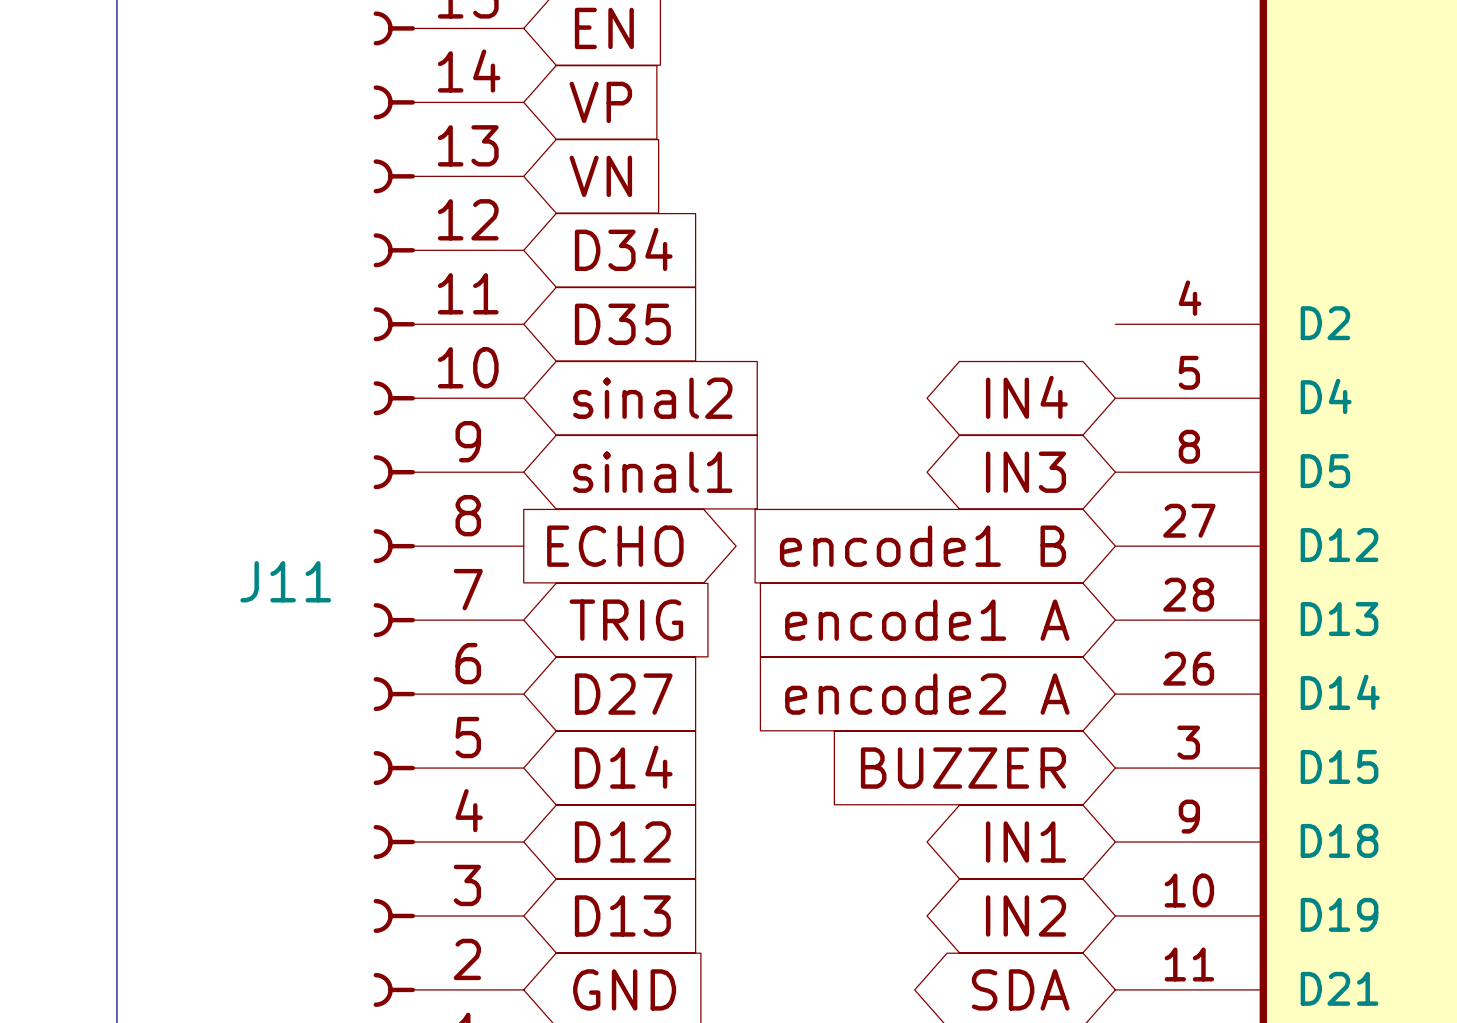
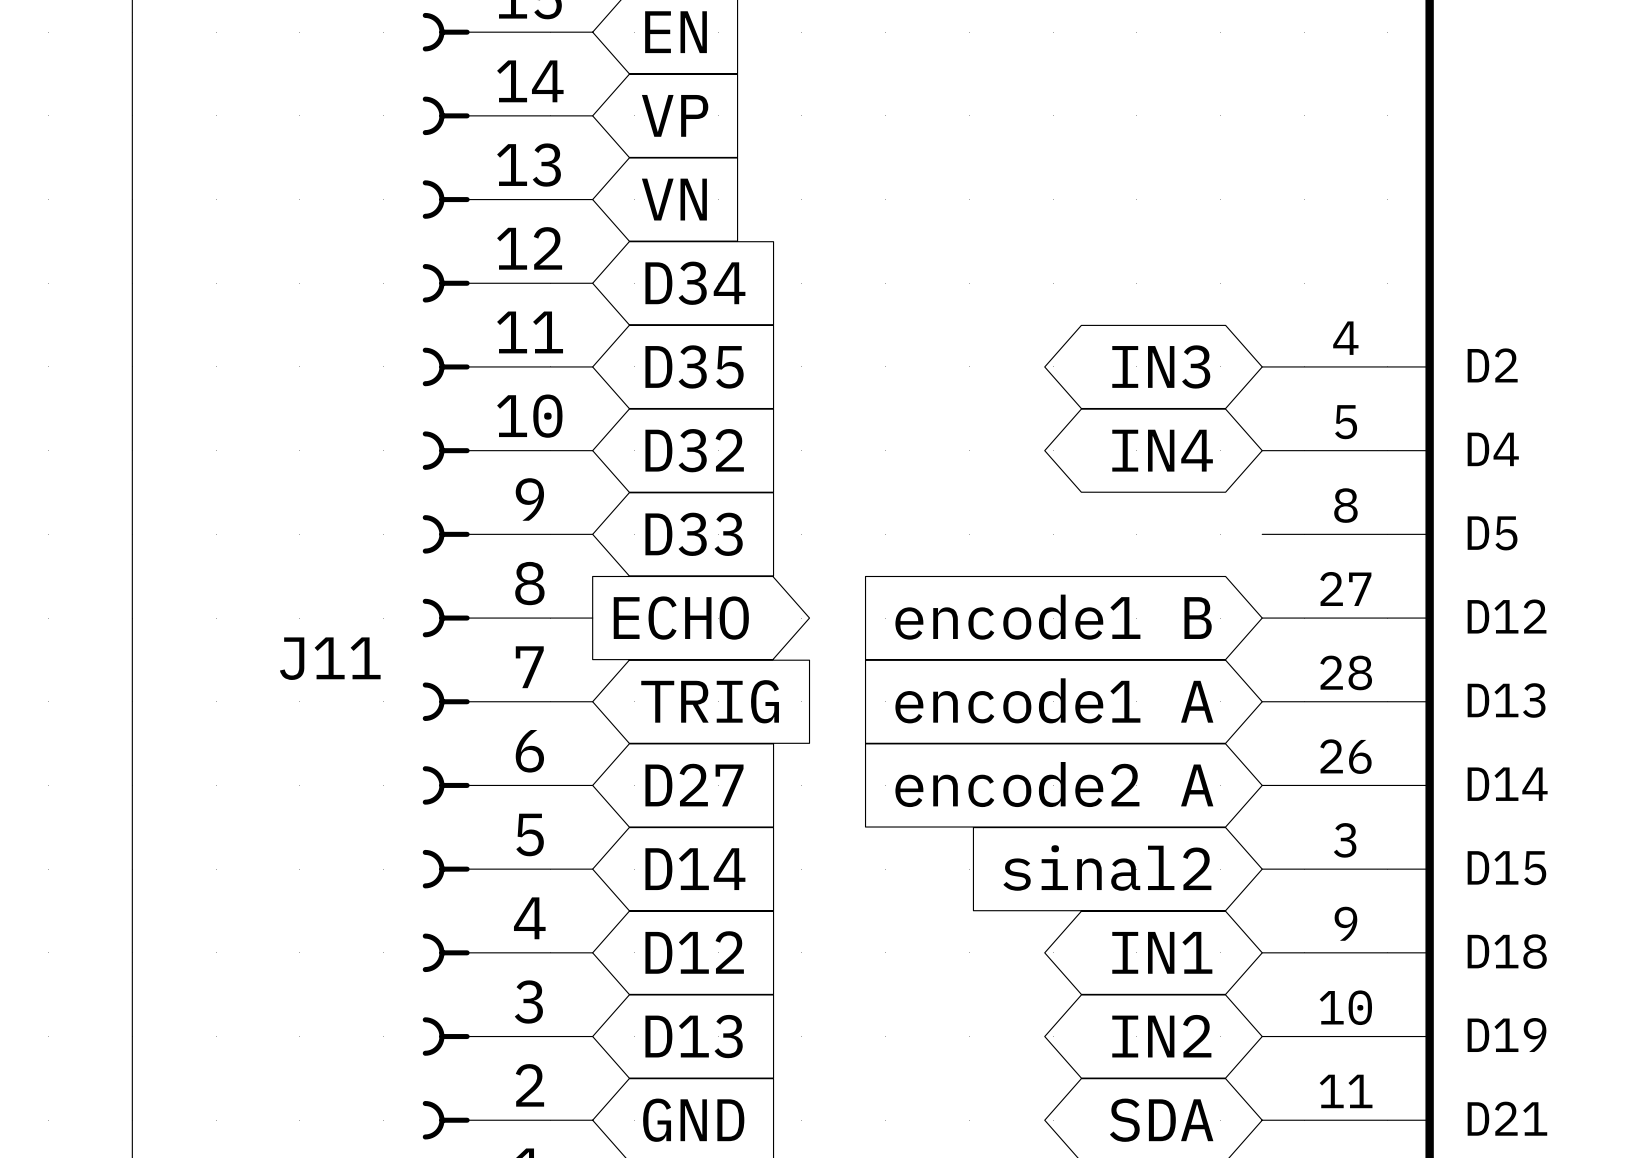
global label: sinal2 (652, 398) -> D32 (694, 450)
global label: sinal1 (652, 472) -> D33 (694, 534)
global label position: IN3 (1025, 472) -> IN3 (1161, 366)
global label: BUZZER (963, 768) -> sinal2 (1107, 868)

